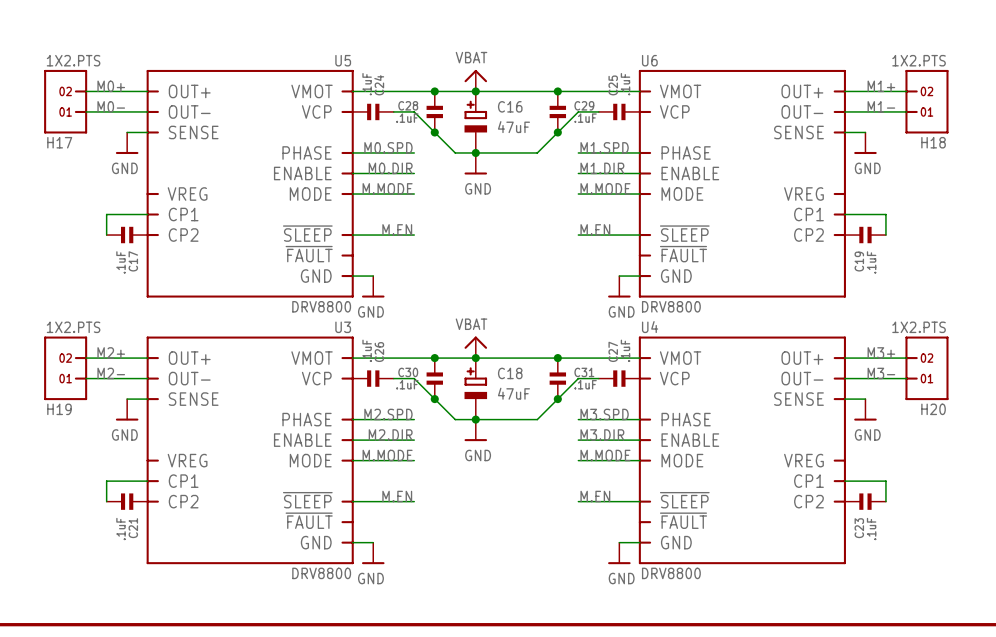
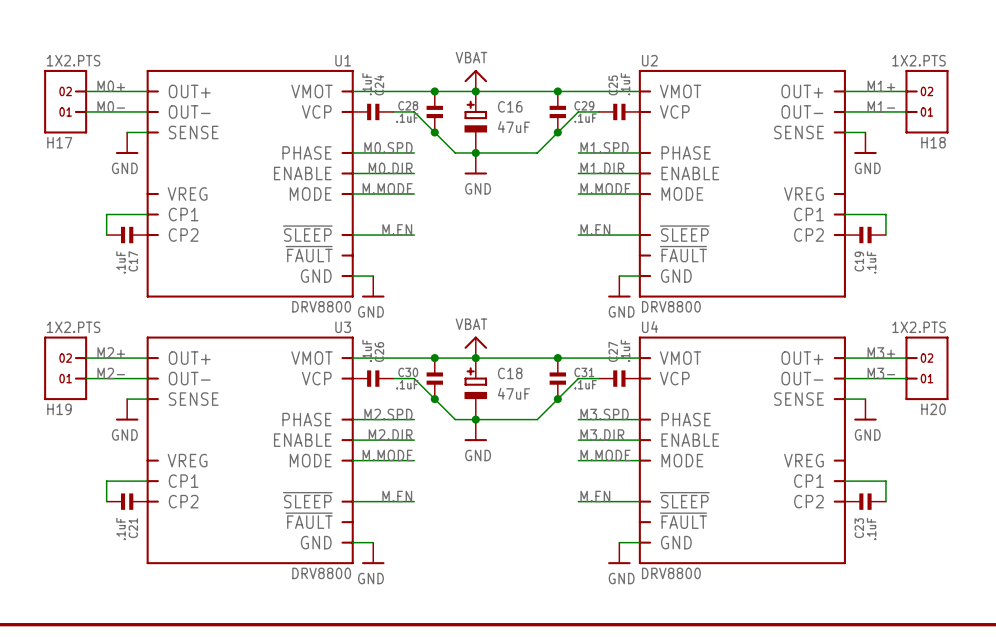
U5 name: U5 (343, 60) -> U1 (343, 60)
U6 name: U6 (649, 60) -> U2 (649, 60)

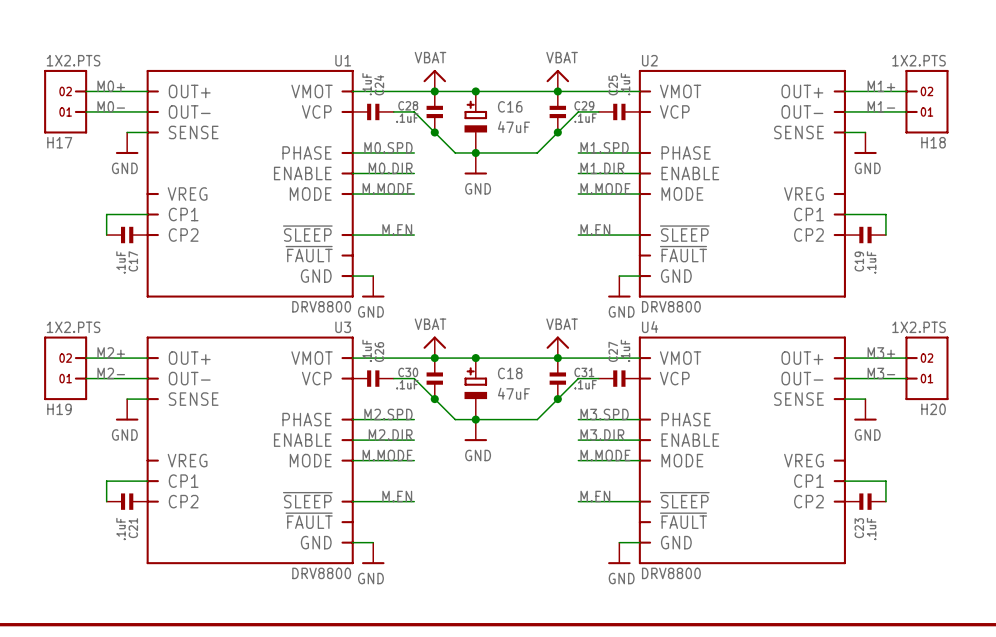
power symbol: none -> VBAT (434, 80)
power symbol: VBAT (475, 80) -> none
power symbol: none -> VBAT (557, 80)
power symbol: none -> VBAT (434, 347)
power symbol: VBAT (475, 347) -> none
power symbol: none -> VBAT (557, 347)

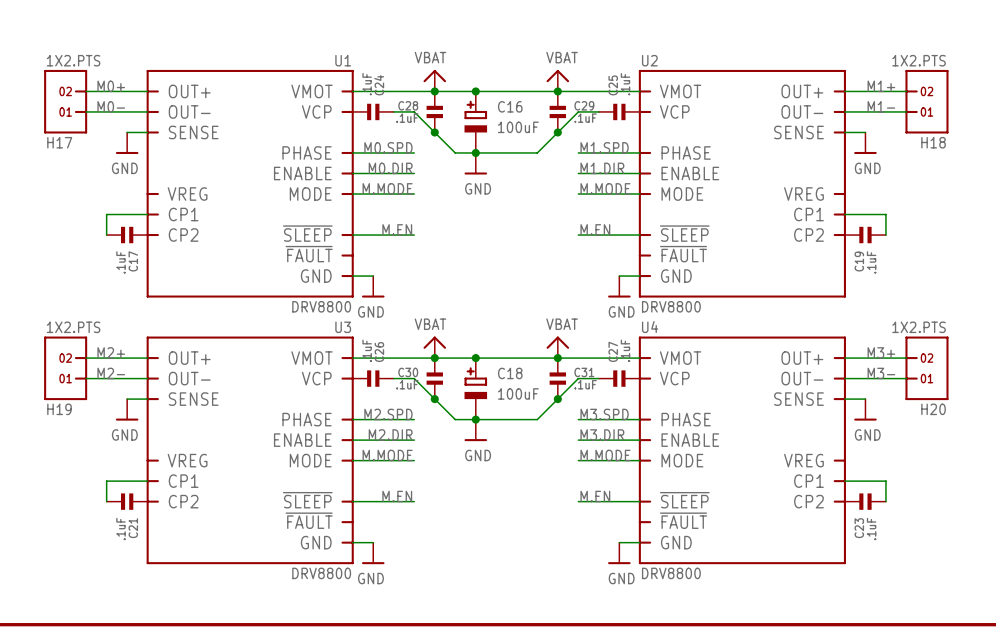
C16 value: 47uF (513, 127) -> 100uF (518, 127)
C18 value: 47uF (513, 393) -> 100uF (518, 393)

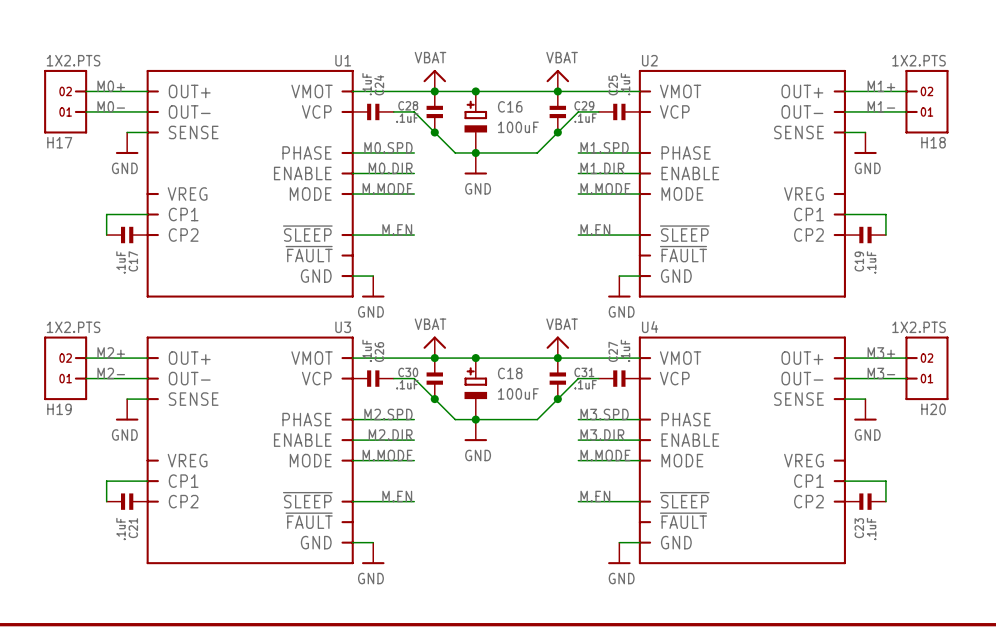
U1 value: DRV8800 (321, 306) -> none
U2 value: DRV8800 (671, 306) -> none
U3 value: DRV8800 (321, 573) -> none
U4 value: DRV8800 (671, 573) -> none

